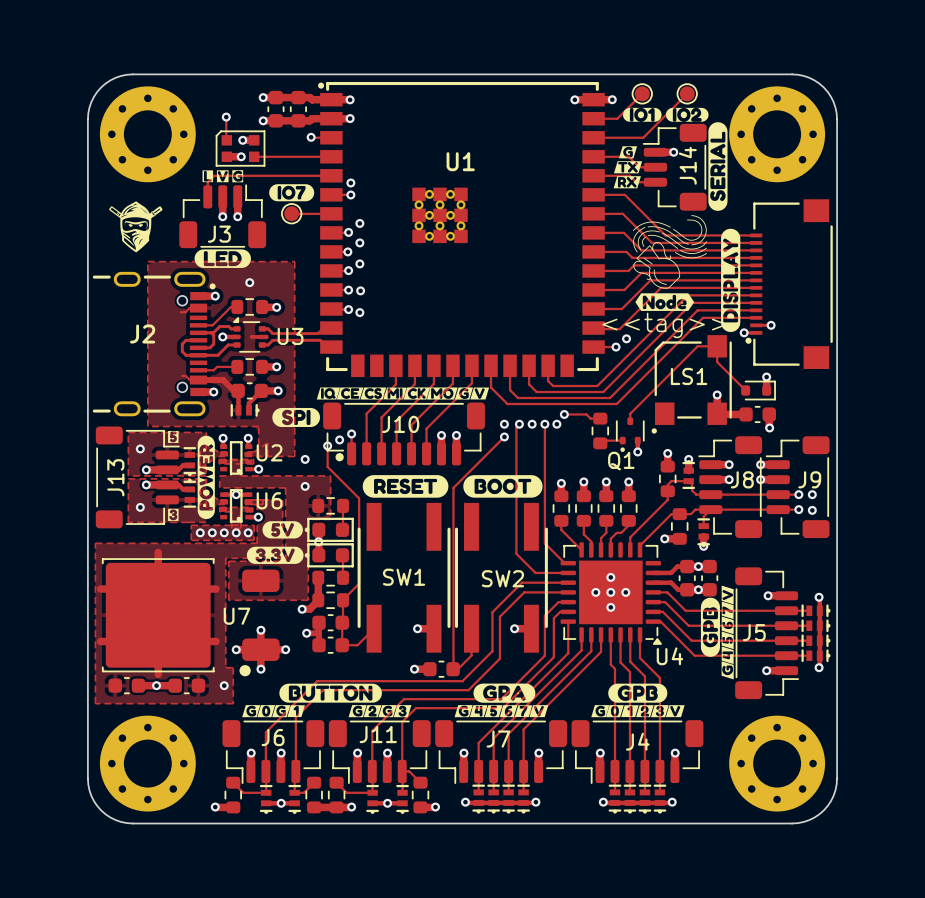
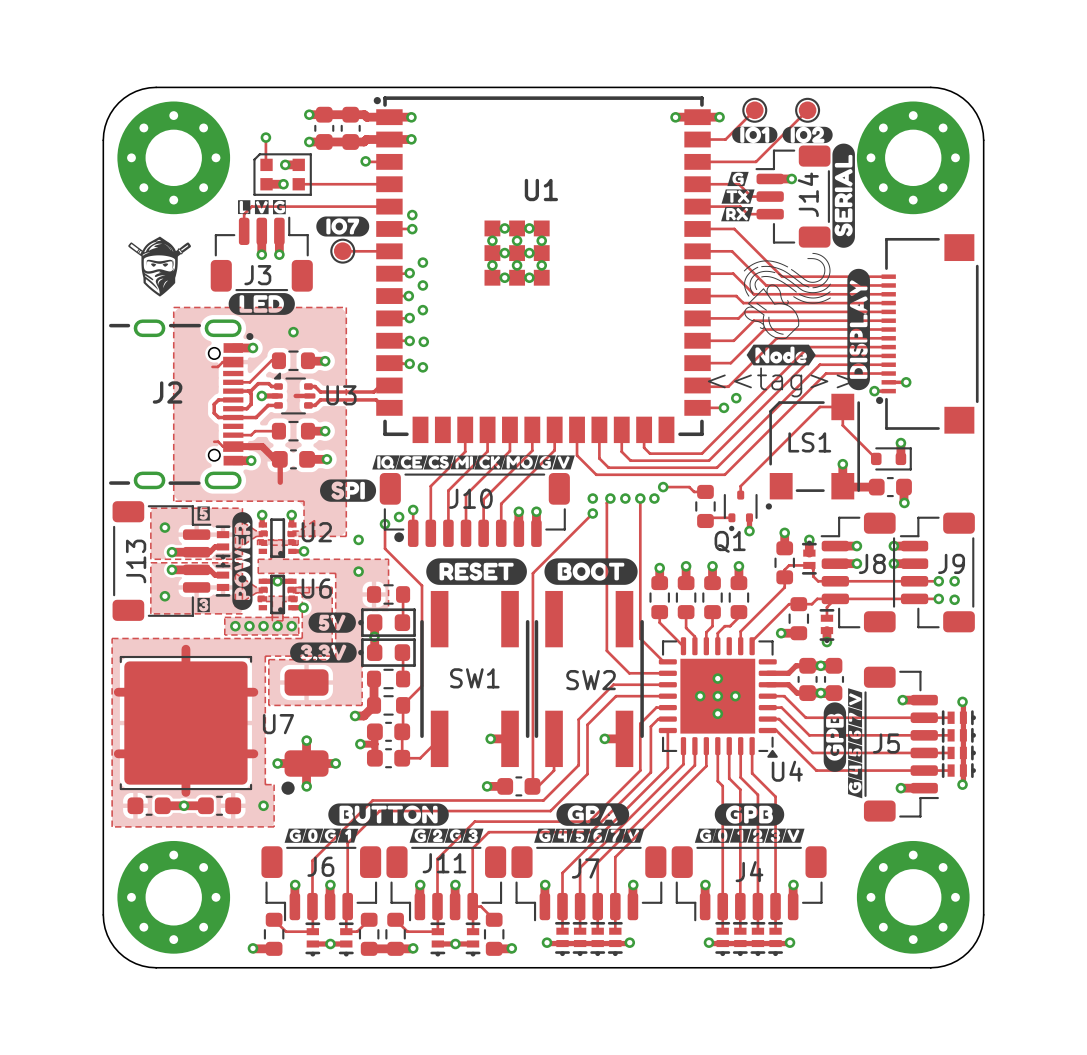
track: (261, 390) (248, 403) (248, 410) -> none
part: (245, 410) -> none

